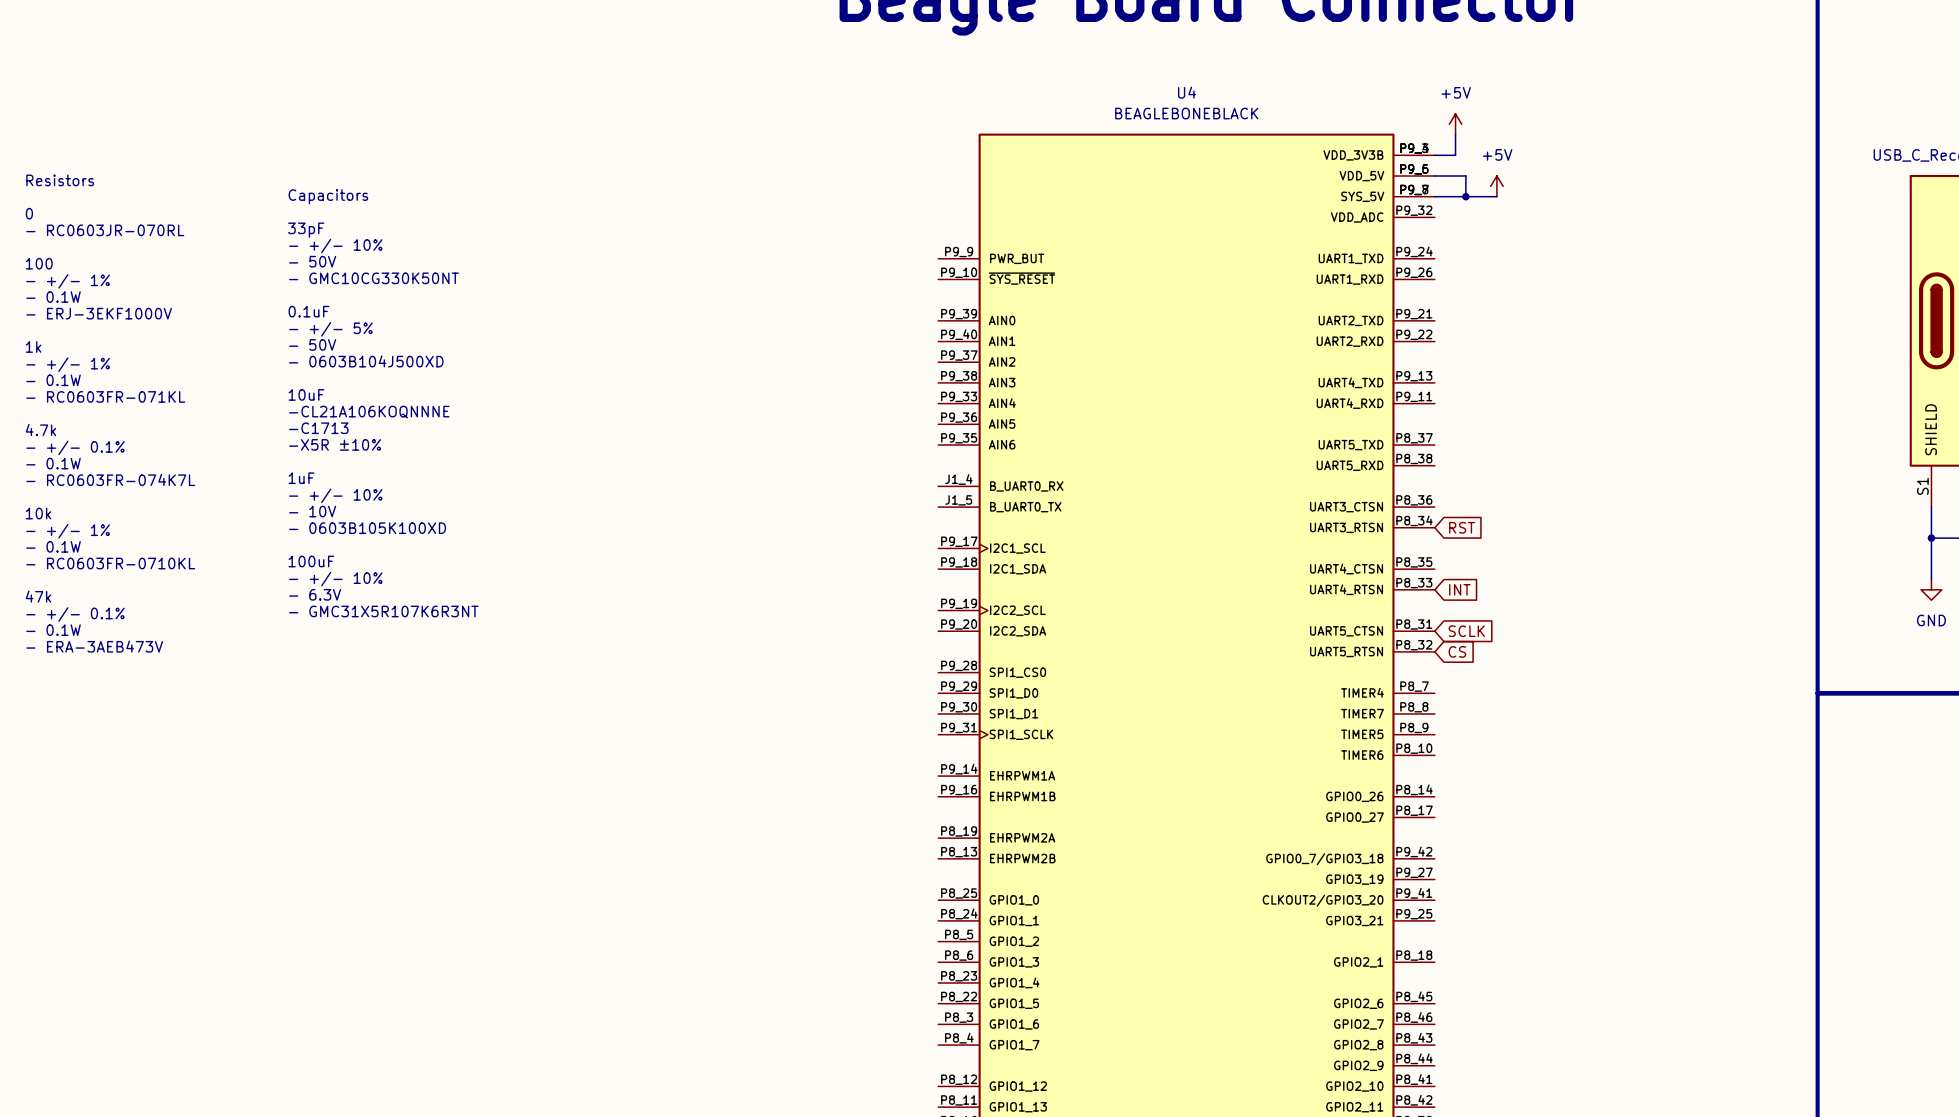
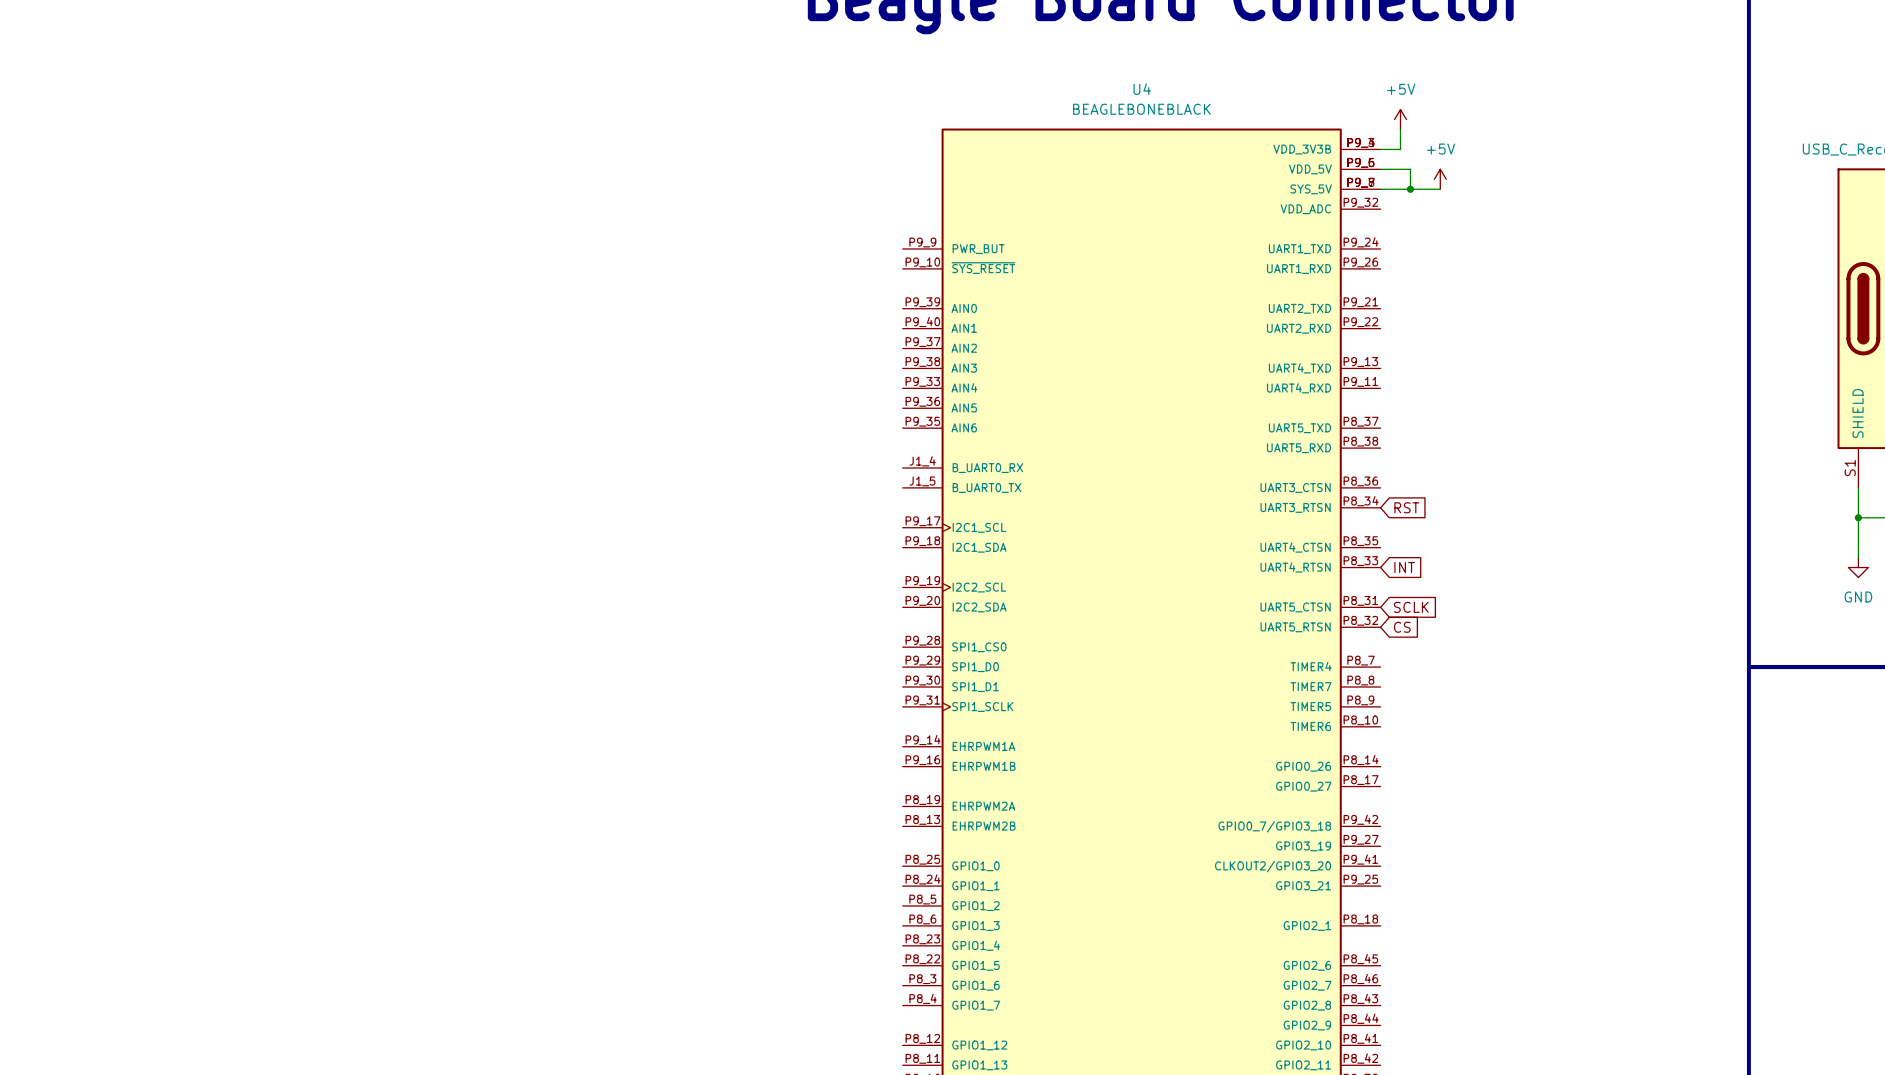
text: Resistors (60, 180) -> none
text: Capacitors (328, 196) -> none
text: 0 (29, 213) -> none
text: - RC0603JR-070RL (105, 230) -> none
text: 33pF (306, 230) -> none
text: - +/- 10% (335, 246) -> none
text: - 50V (312, 261) -> none
text: 100 (39, 263) -> none
text: - GMC10CG330K50NT (373, 278) -> none
text: - +/- 1% (68, 281) -> none
text: - 0.1W (53, 297) -> none
text: 0.1uF (308, 311) -> none
text: - ERJ-3EKF1000V (99, 313) -> none
text: - +/- 5% (330, 329) -> none
text: - 50V (312, 344) -> none
text: 1k (33, 346) -> none
text: - 0603B104J500XD (366, 361) -> none
text: - +/- 1% (68, 364) -> none
text: - 0.1W (53, 380) -> none
text: 10uF (306, 394) -> none
text: - RC0603FR-071KL (105, 396) -> none
text: -CL21A106KOQNNNE (369, 412) -> none
text: -C1713 (318, 428) -> none
text: 4.7k (40, 430) -> none
text: -X5R ±10% (335, 444) -> none
text: - +/- 0.1% (75, 447) -> none
text: - 0.1W (53, 463) -> none
text: 1uF (301, 478) -> none
text: - RC0603FR-074K7L (110, 479) -> none
text: - +/- 10% (335, 495) -> none
text: - 10V (312, 511) -> none
text: 10k (38, 513) -> none
text: - 0603B105K100XD (367, 528) -> none
text: - +/- 1% (68, 531) -> none
text: - 0.1W (53, 546) -> none
text: 100uF (311, 561) -> none
text: - RC0603FR-0710KL (110, 563) -> none
text: - +/- 10% (335, 579) -> none
text: - 6.3V (315, 594) -> none
text: 47k (38, 596) -> none
text: - GMC31X5R107K6R3NT (383, 611) -> none
text: - +/- 0.1% (75, 614) -> none
text: - 0.1W (53, 630) -> none
text: - ERA-3AEB473V (94, 646) -> none

